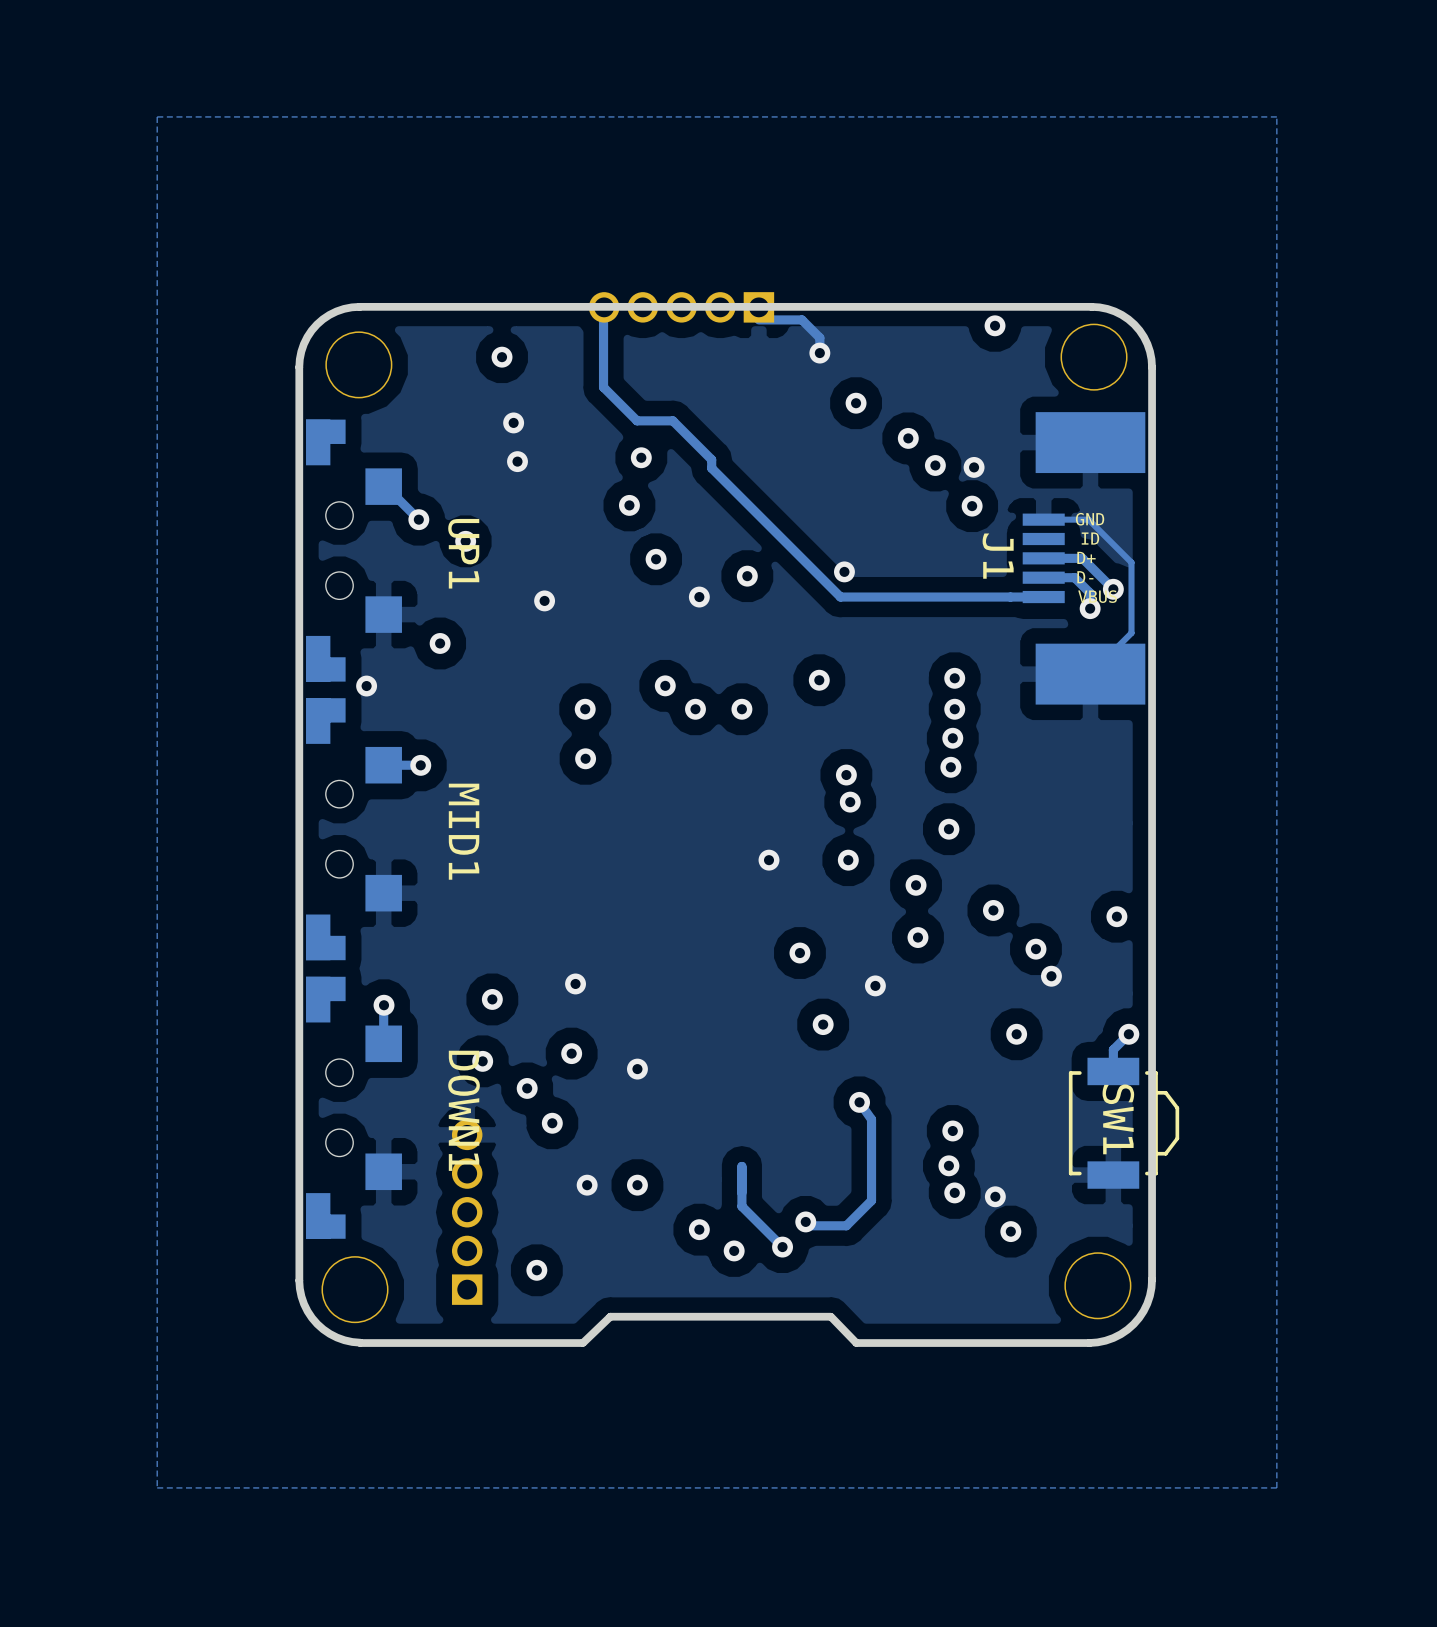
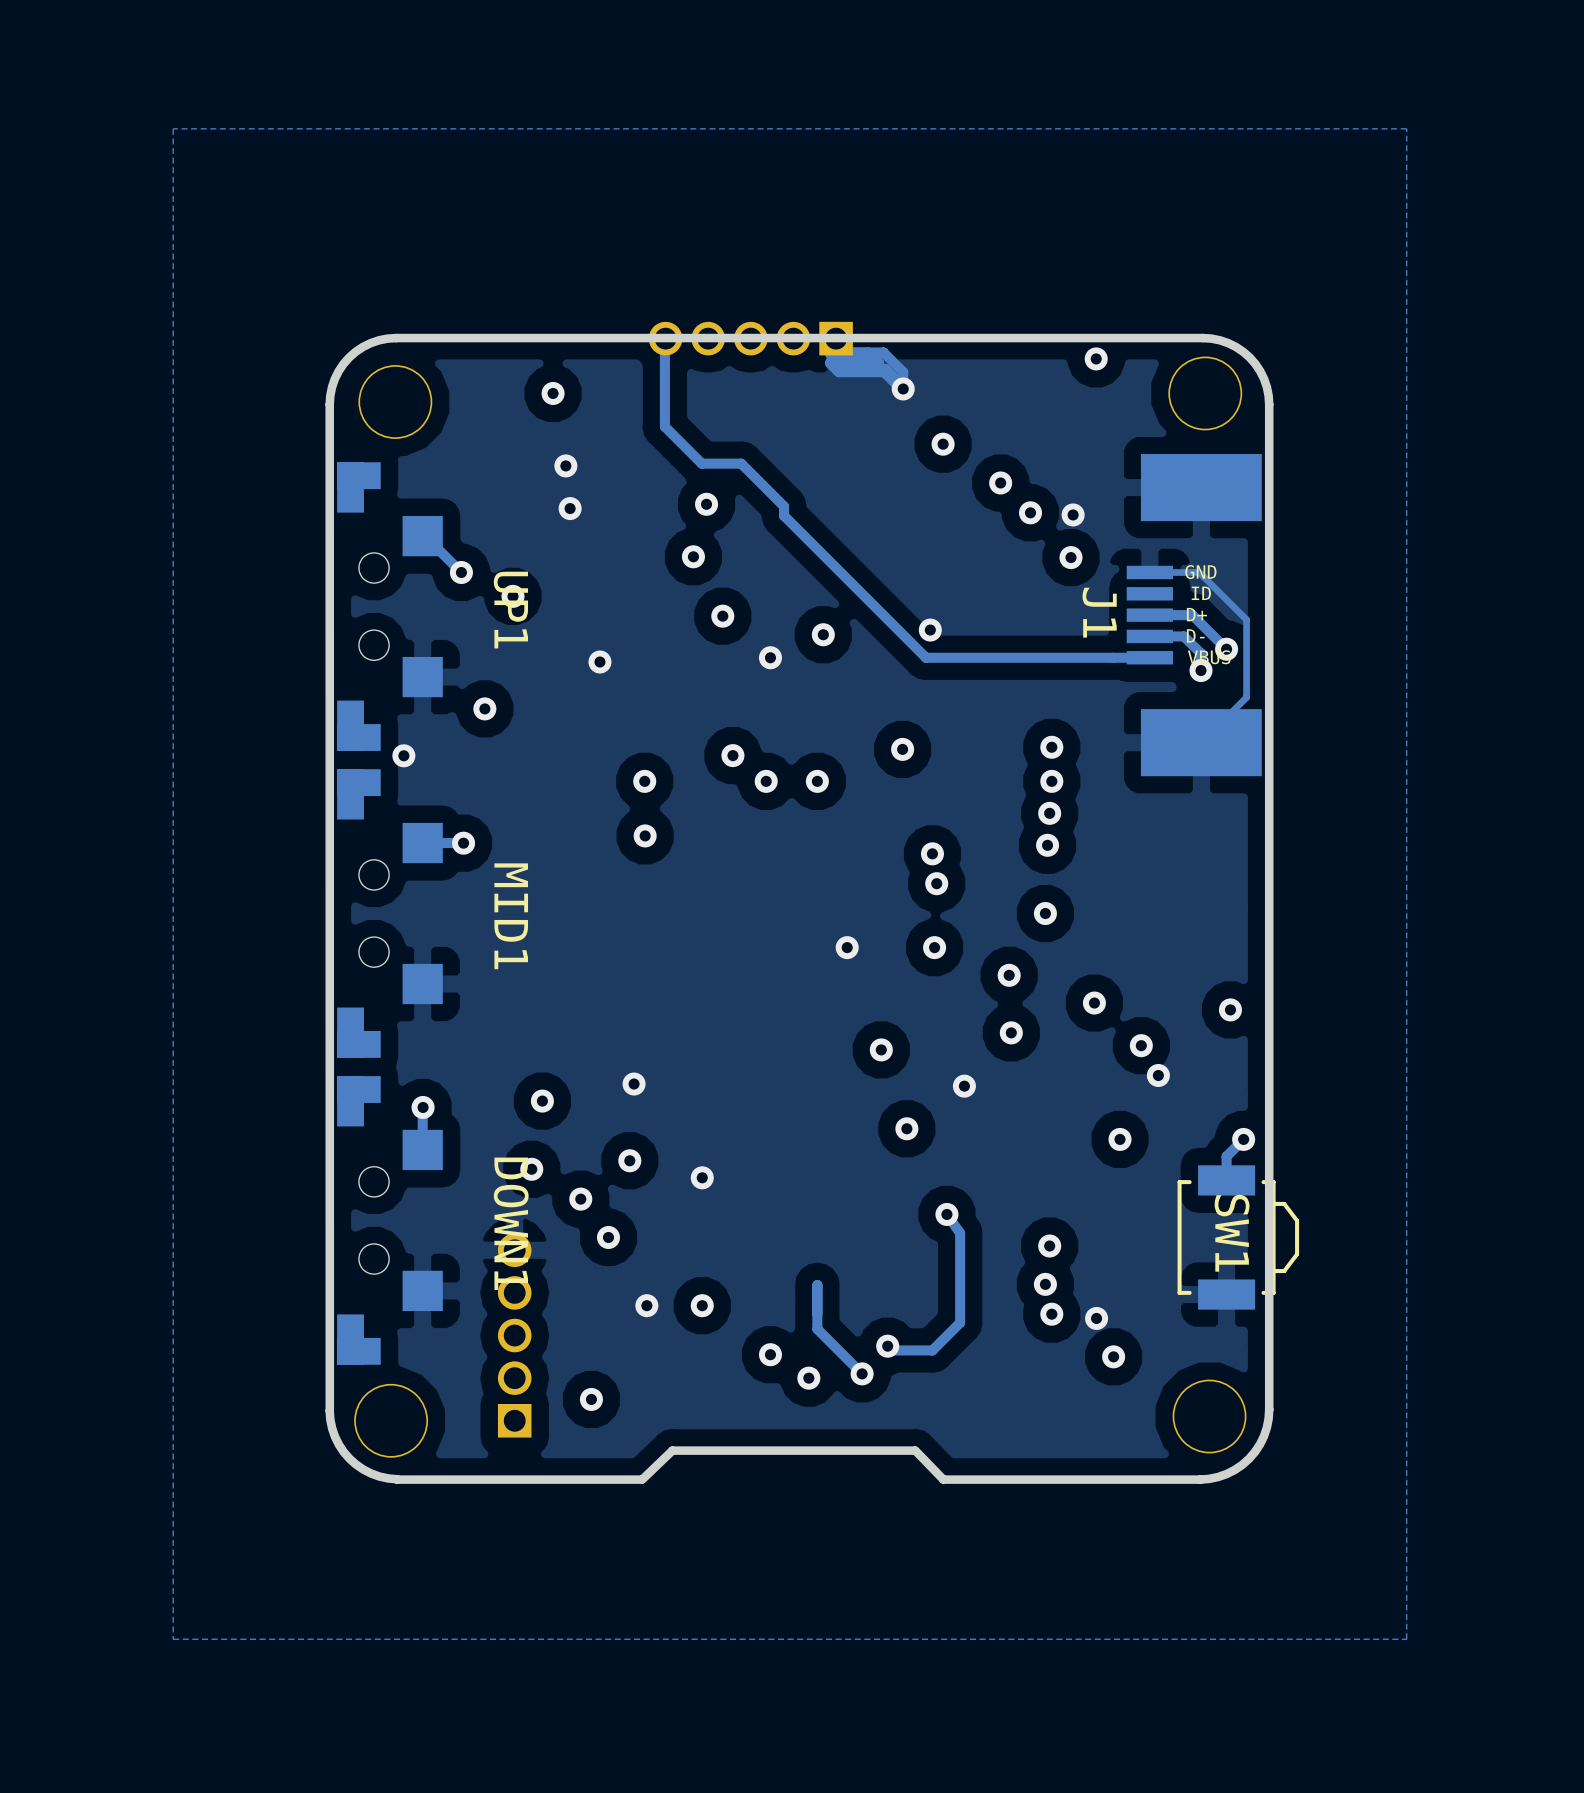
track: none -> (831, 354) (868, 354) (877, 362) (831, 362) (839, 370) (884, 370) (903, 388)

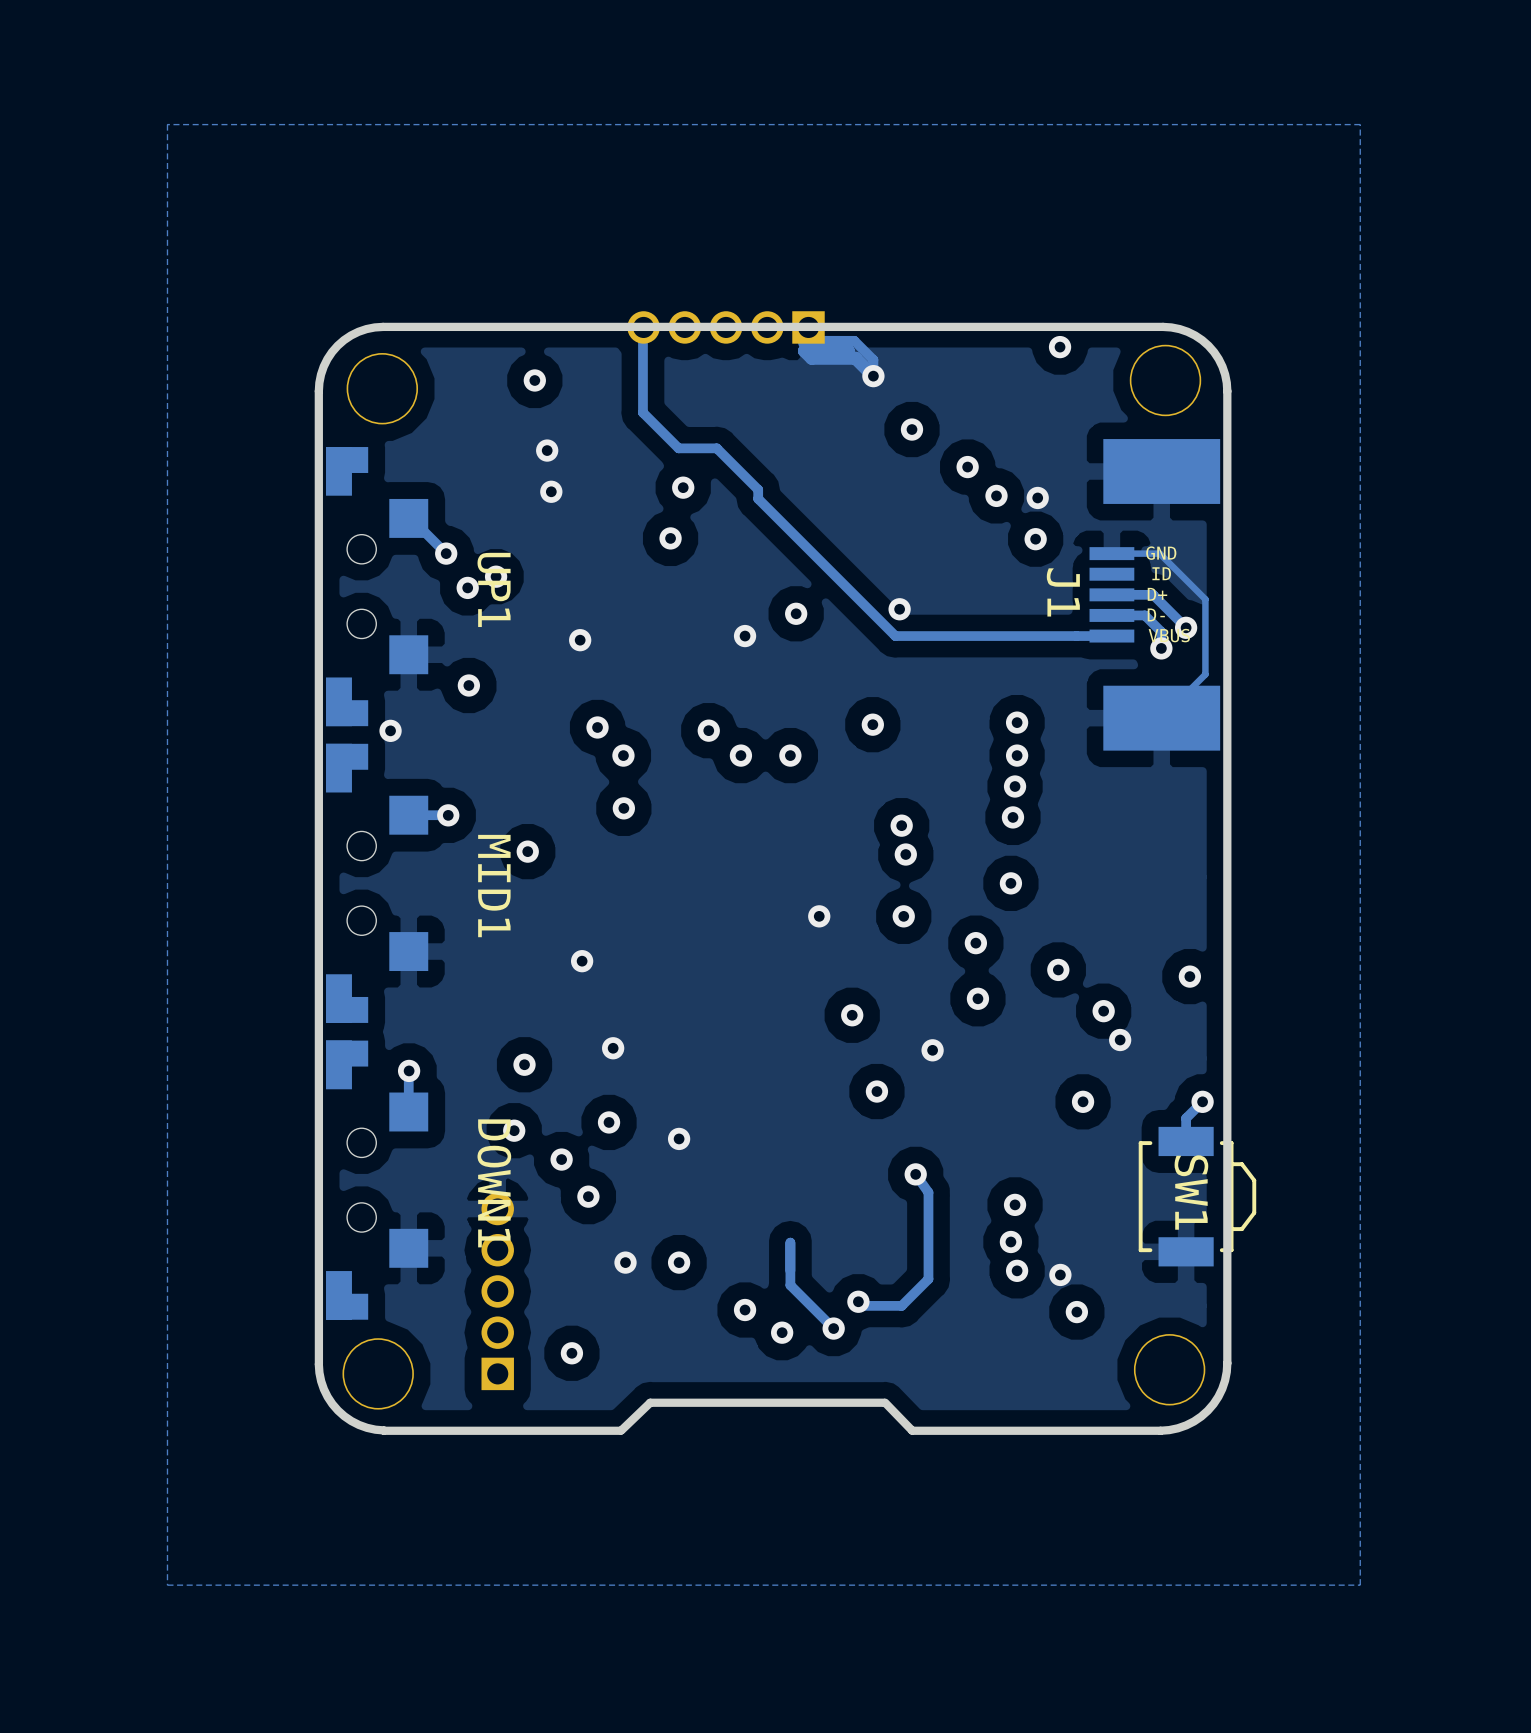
via: none -> (467, 587)
via: (722, 616) -> none
via: none -> (597, 727)
via: none -> (527, 851)
via: none -> (582, 961)

